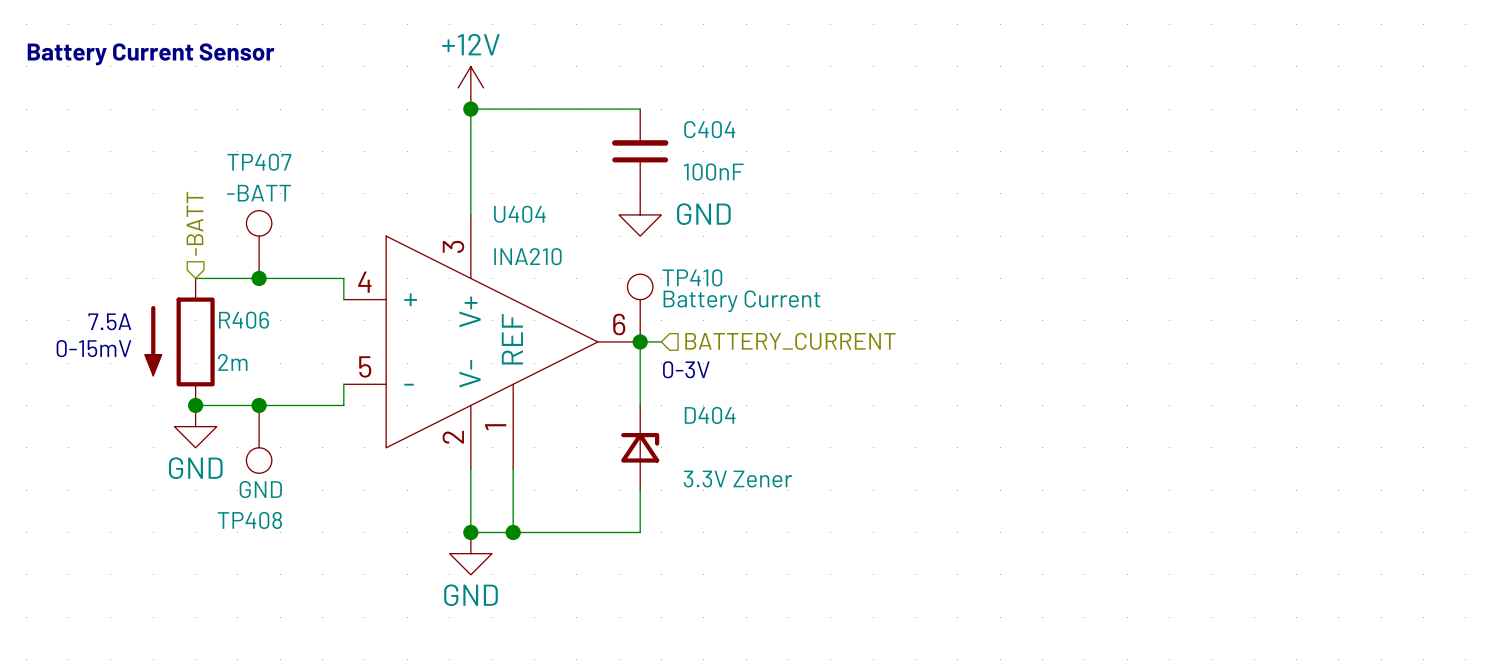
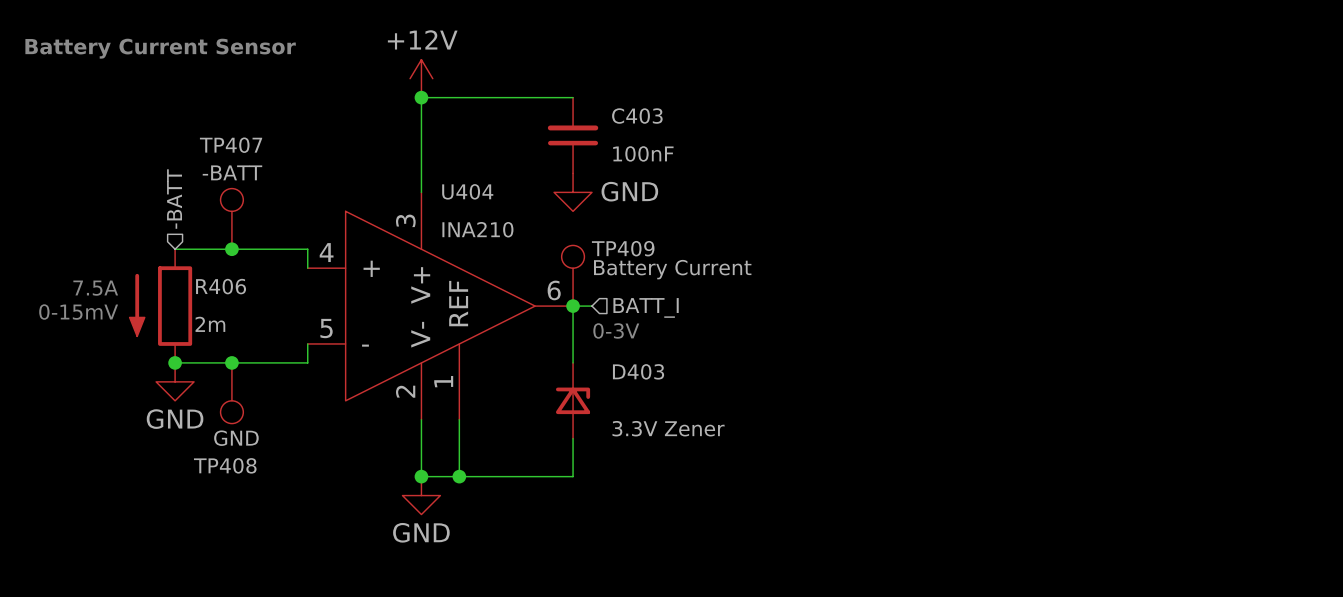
C404 name: C404 (709, 129) -> C403 (637, 116)
TP410 name: TP410 (692, 277) -> TP409 (623, 248)
hierarchical label: BATTERY_CURRENT (790, 341) -> BATT_I (646, 307)
D404 name: D404 (710, 415) -> D403 (638, 371)

